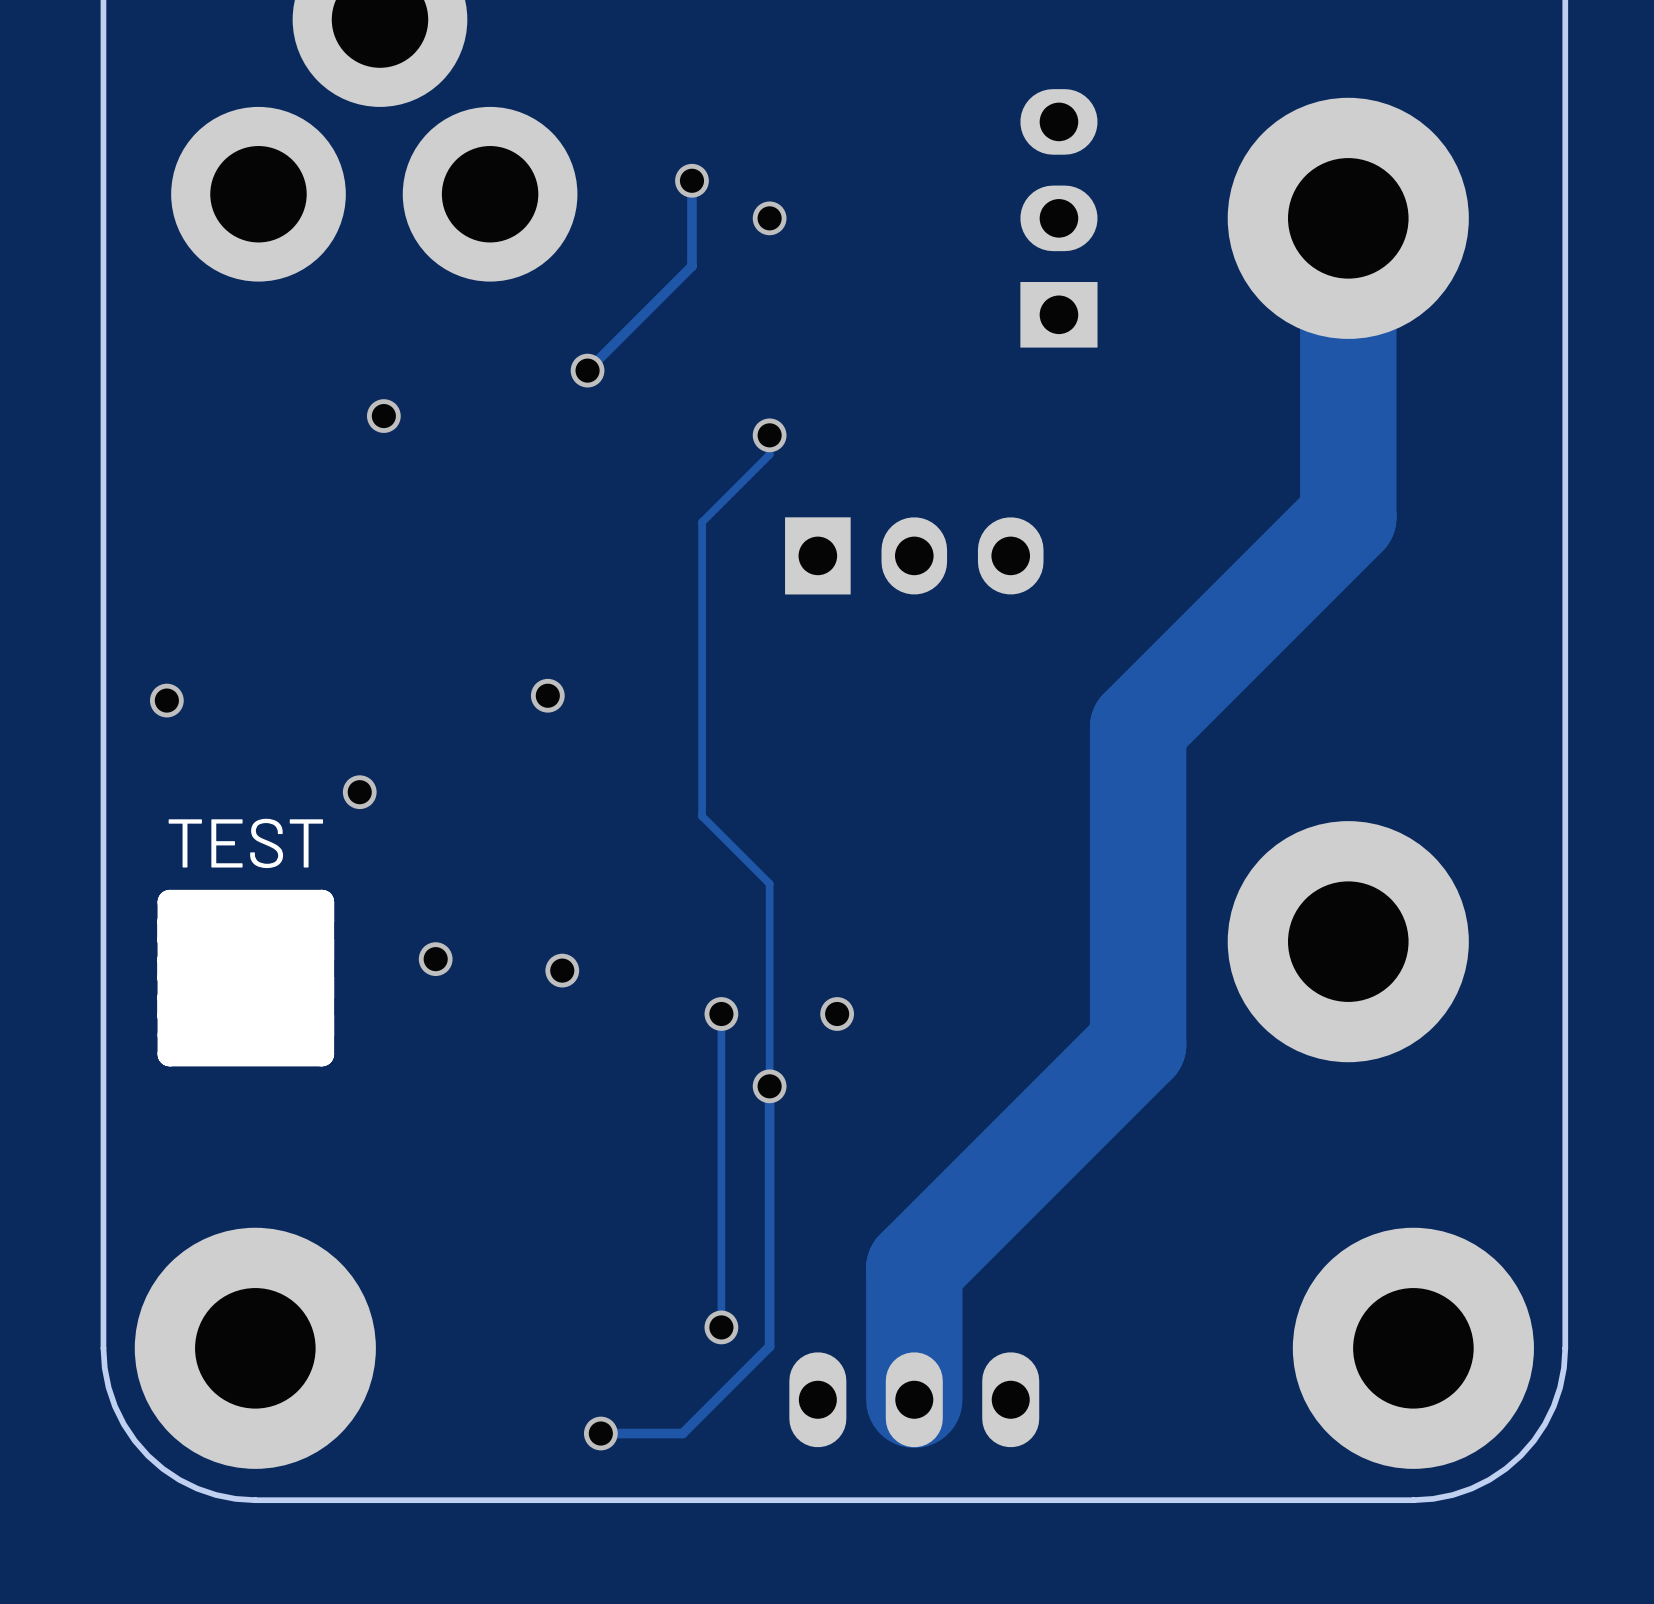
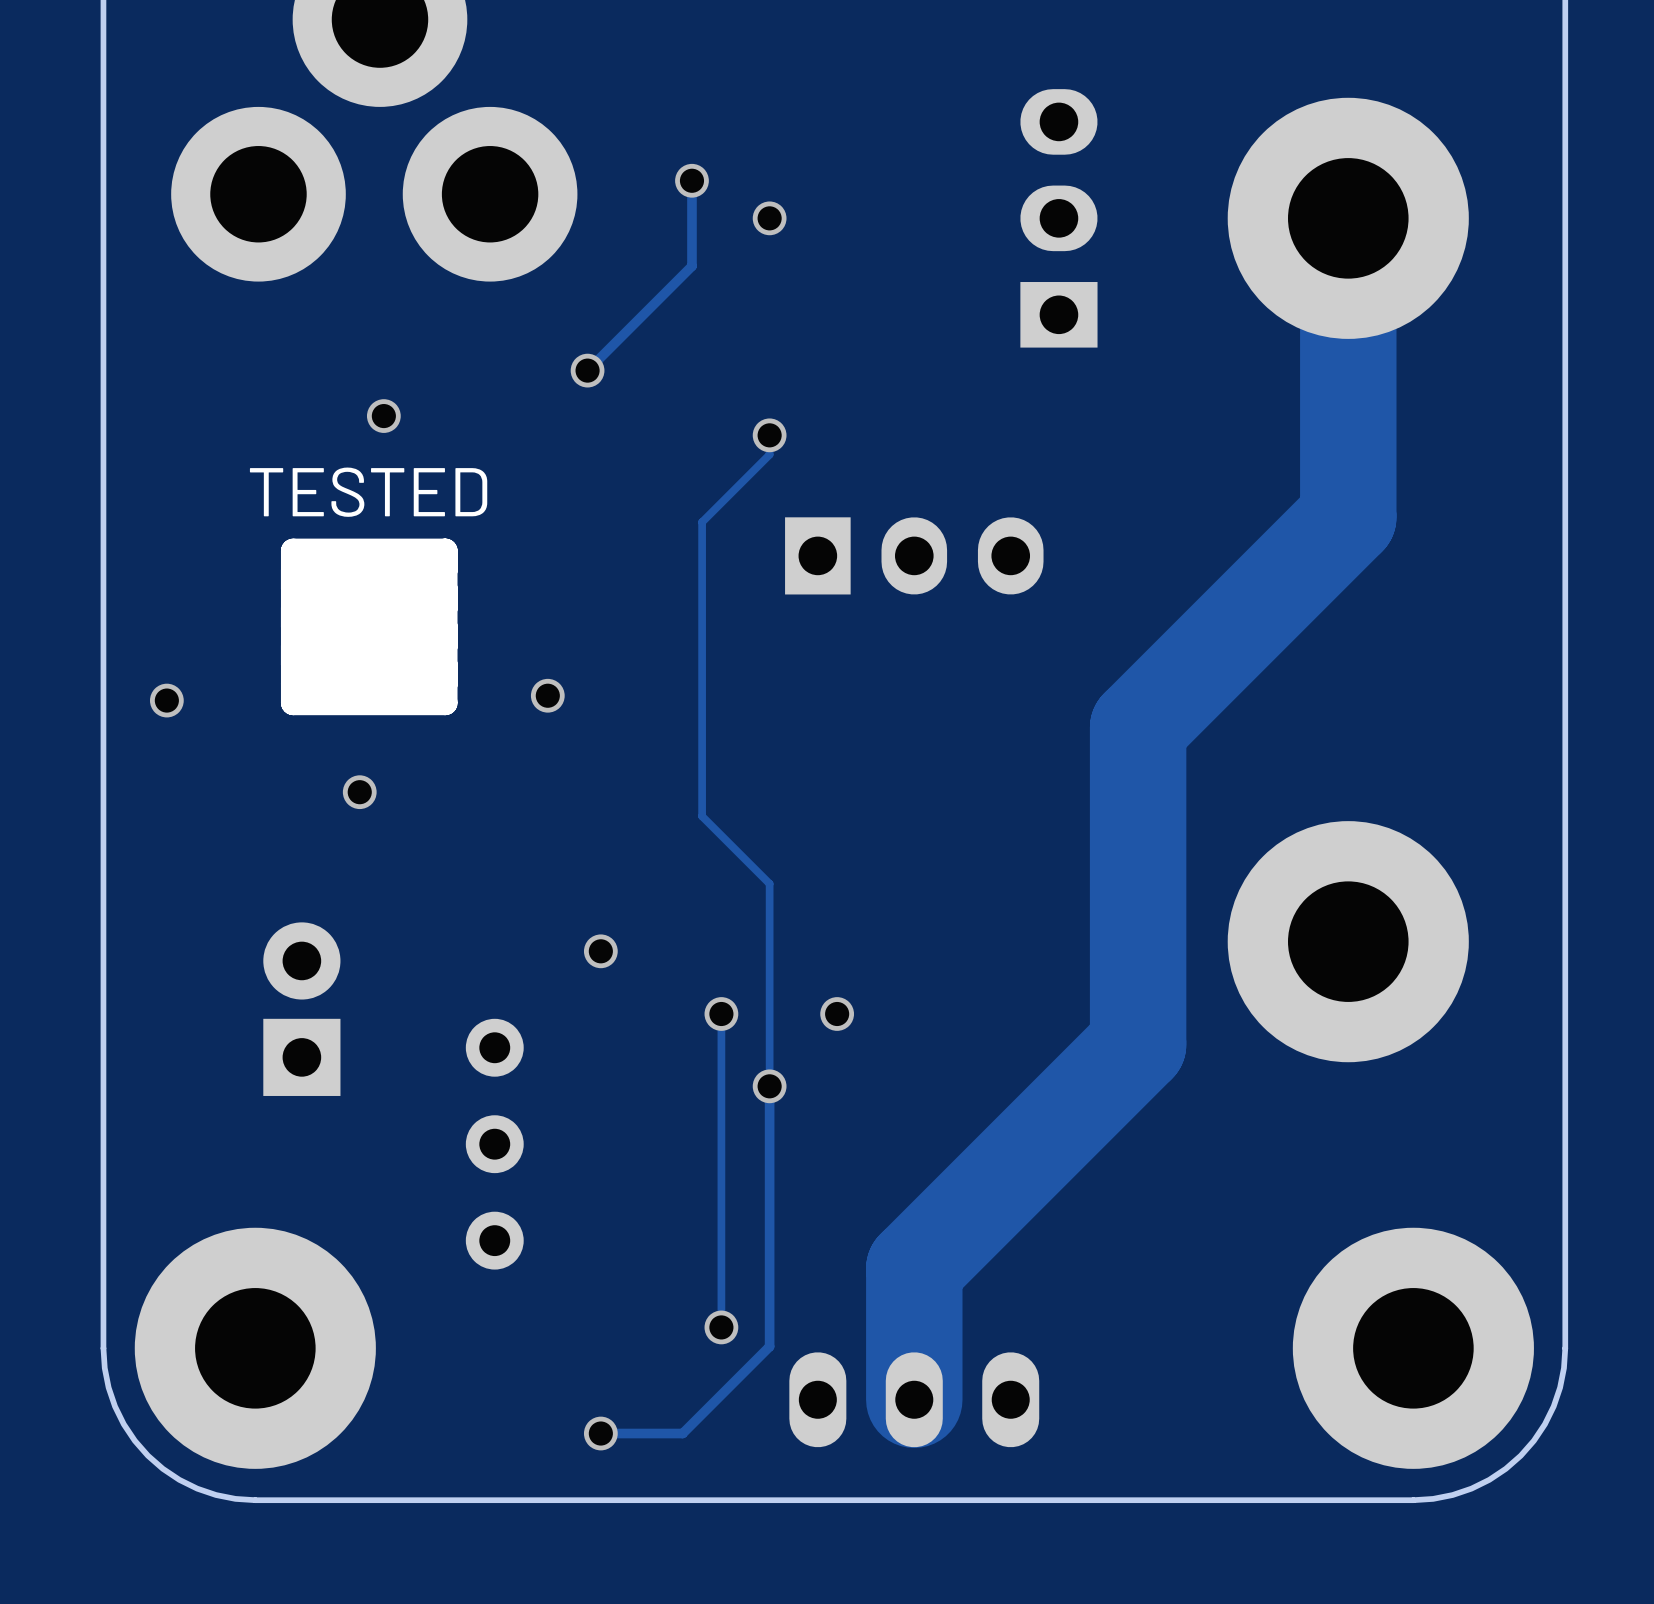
TESTED: none -> (369, 626)
via: (435, 959) -> none
via position: (562, 970) -> (600, 951)
TEST: (245, 978) -> none
part: none -> (301, 1009)
part: none -> (494, 1144)

